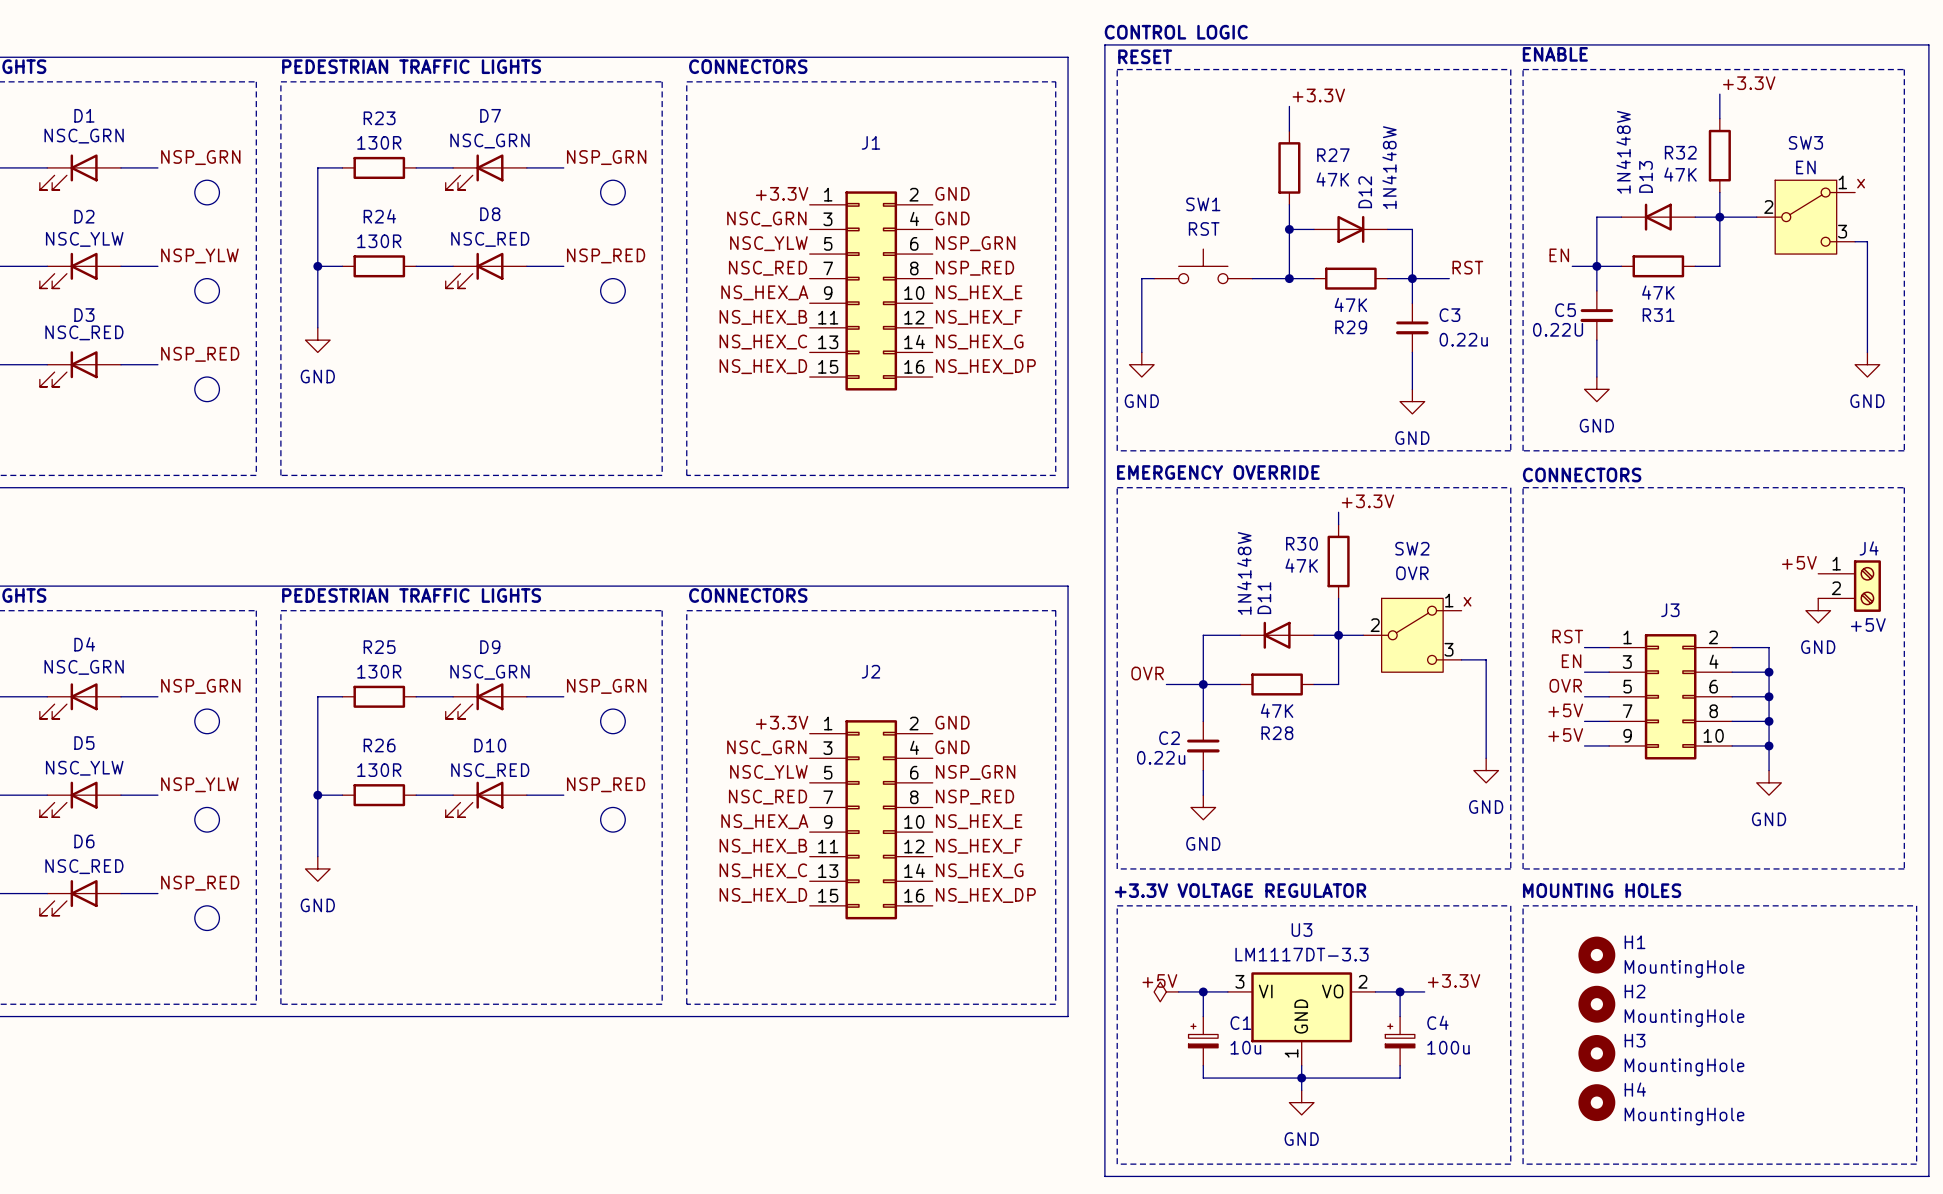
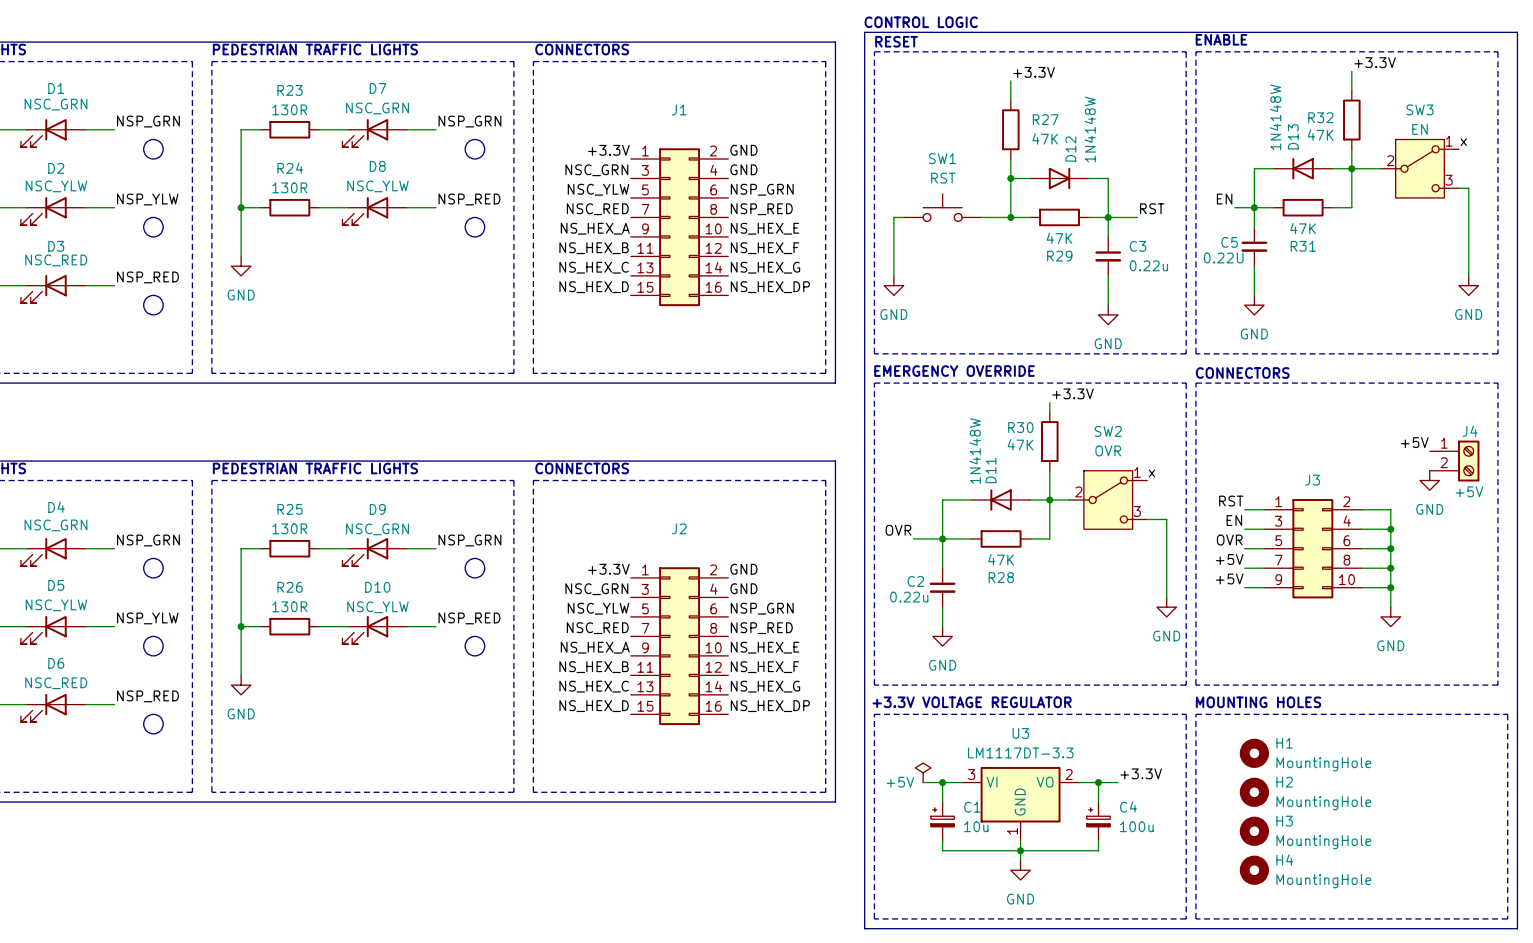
D8 value: NSC_RED (490, 239) -> NSC_YLW (377, 186)
D10 value: NSC_RED (490, 770) -> NSC_YLW (377, 607)
power symbol: none -> +5V (923, 772)
label: +5V (1159, 980) -> none
power symbol: (1166, 991) -> none

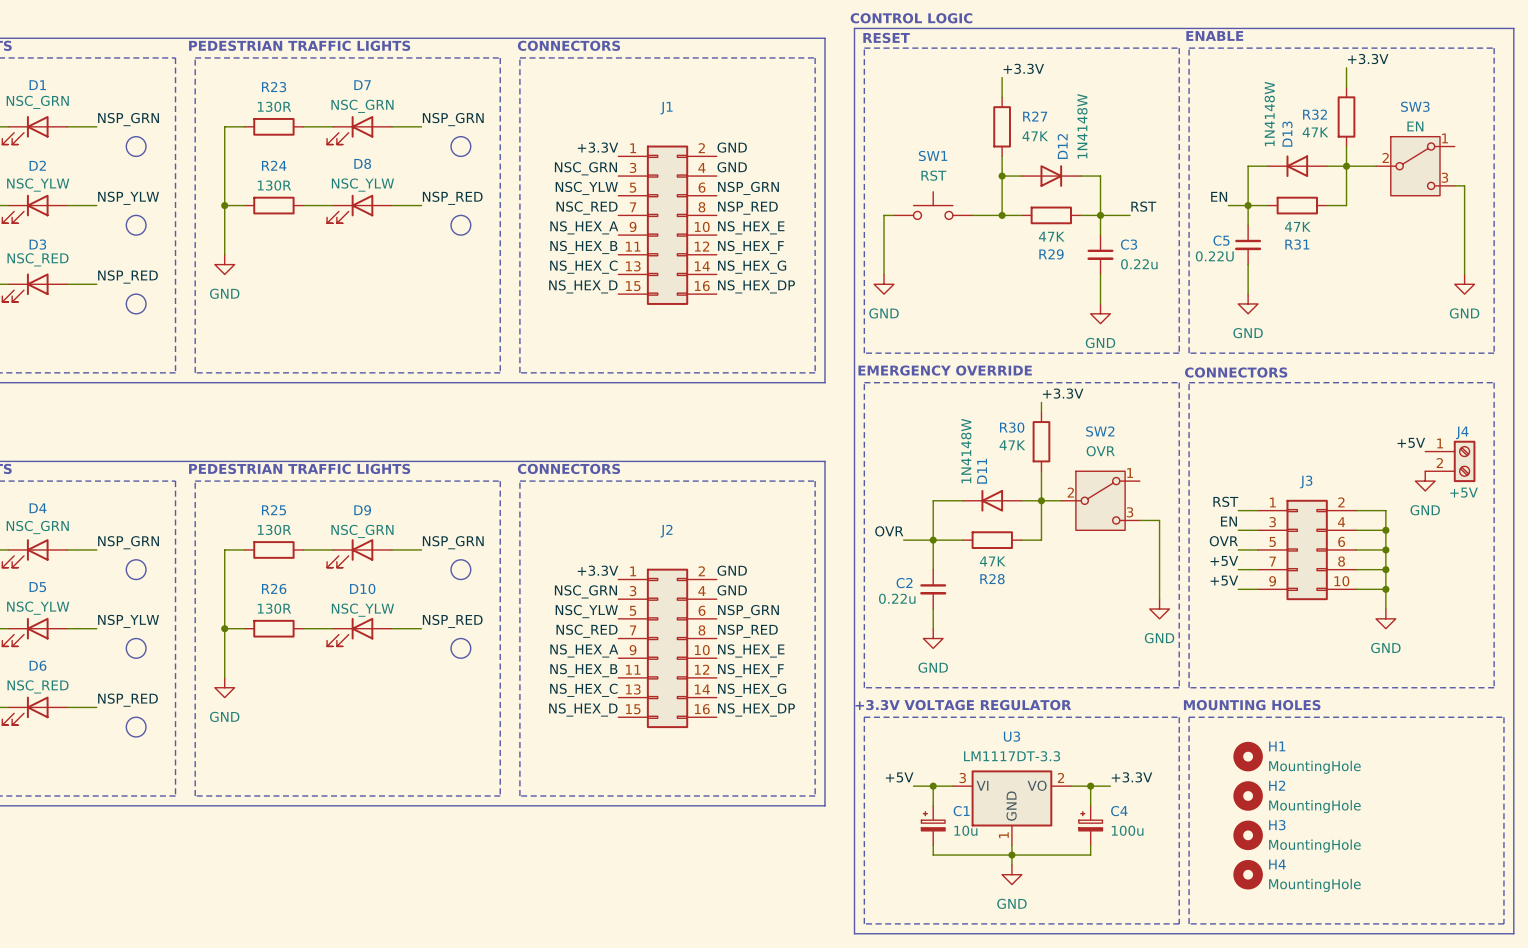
label: x (1463, 142) -> none
label: x (1151, 473) -> none
power symbol: +5V (923, 772) -> none
label: none -> +5V (899, 777)

